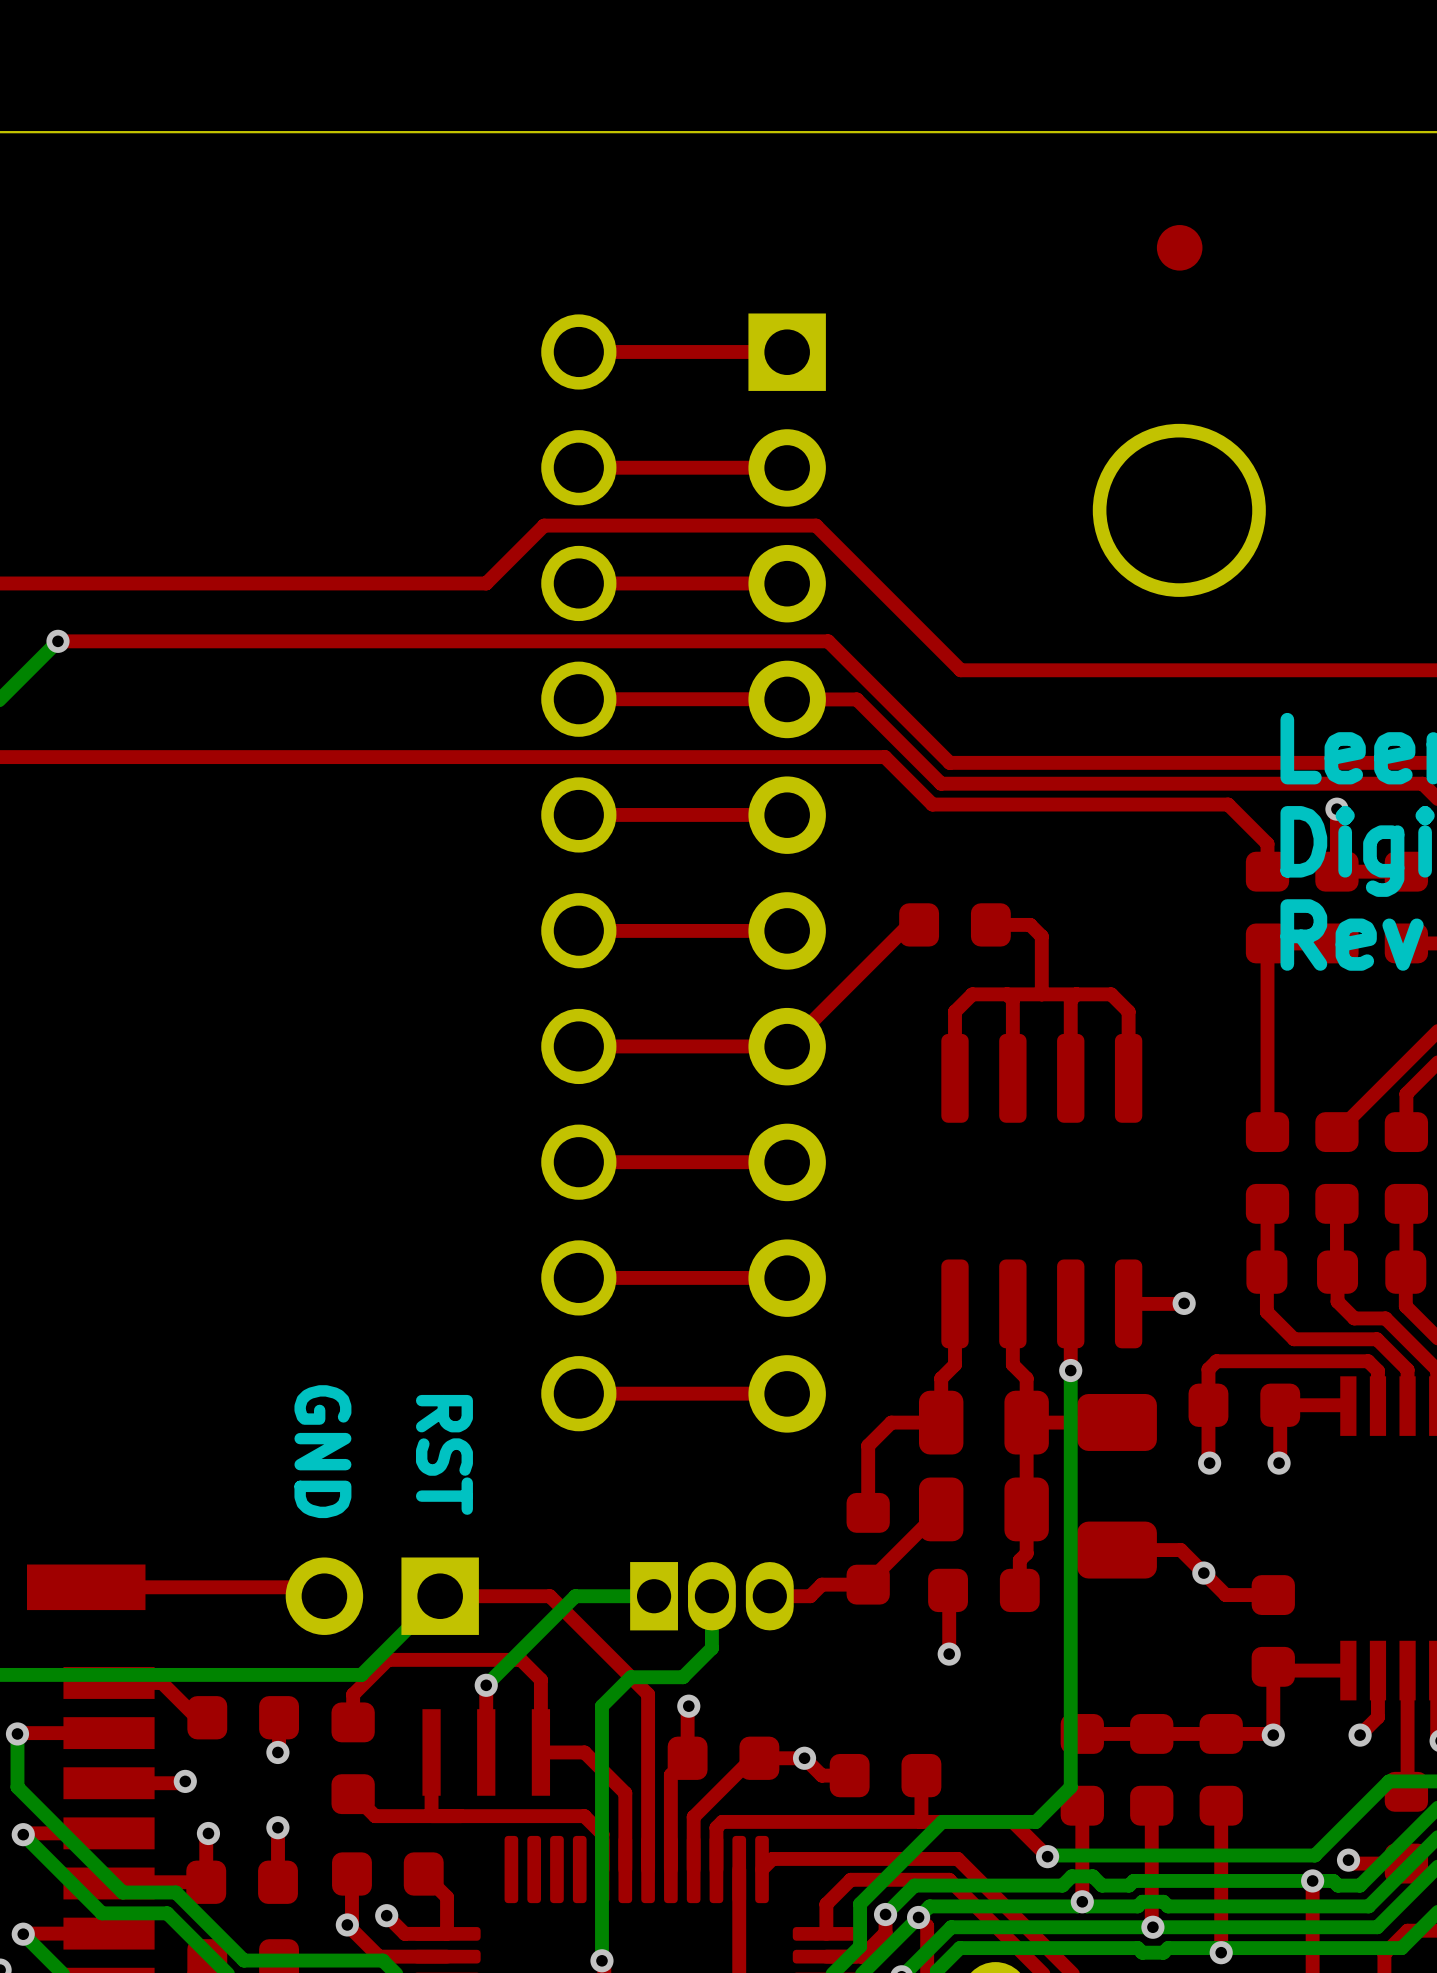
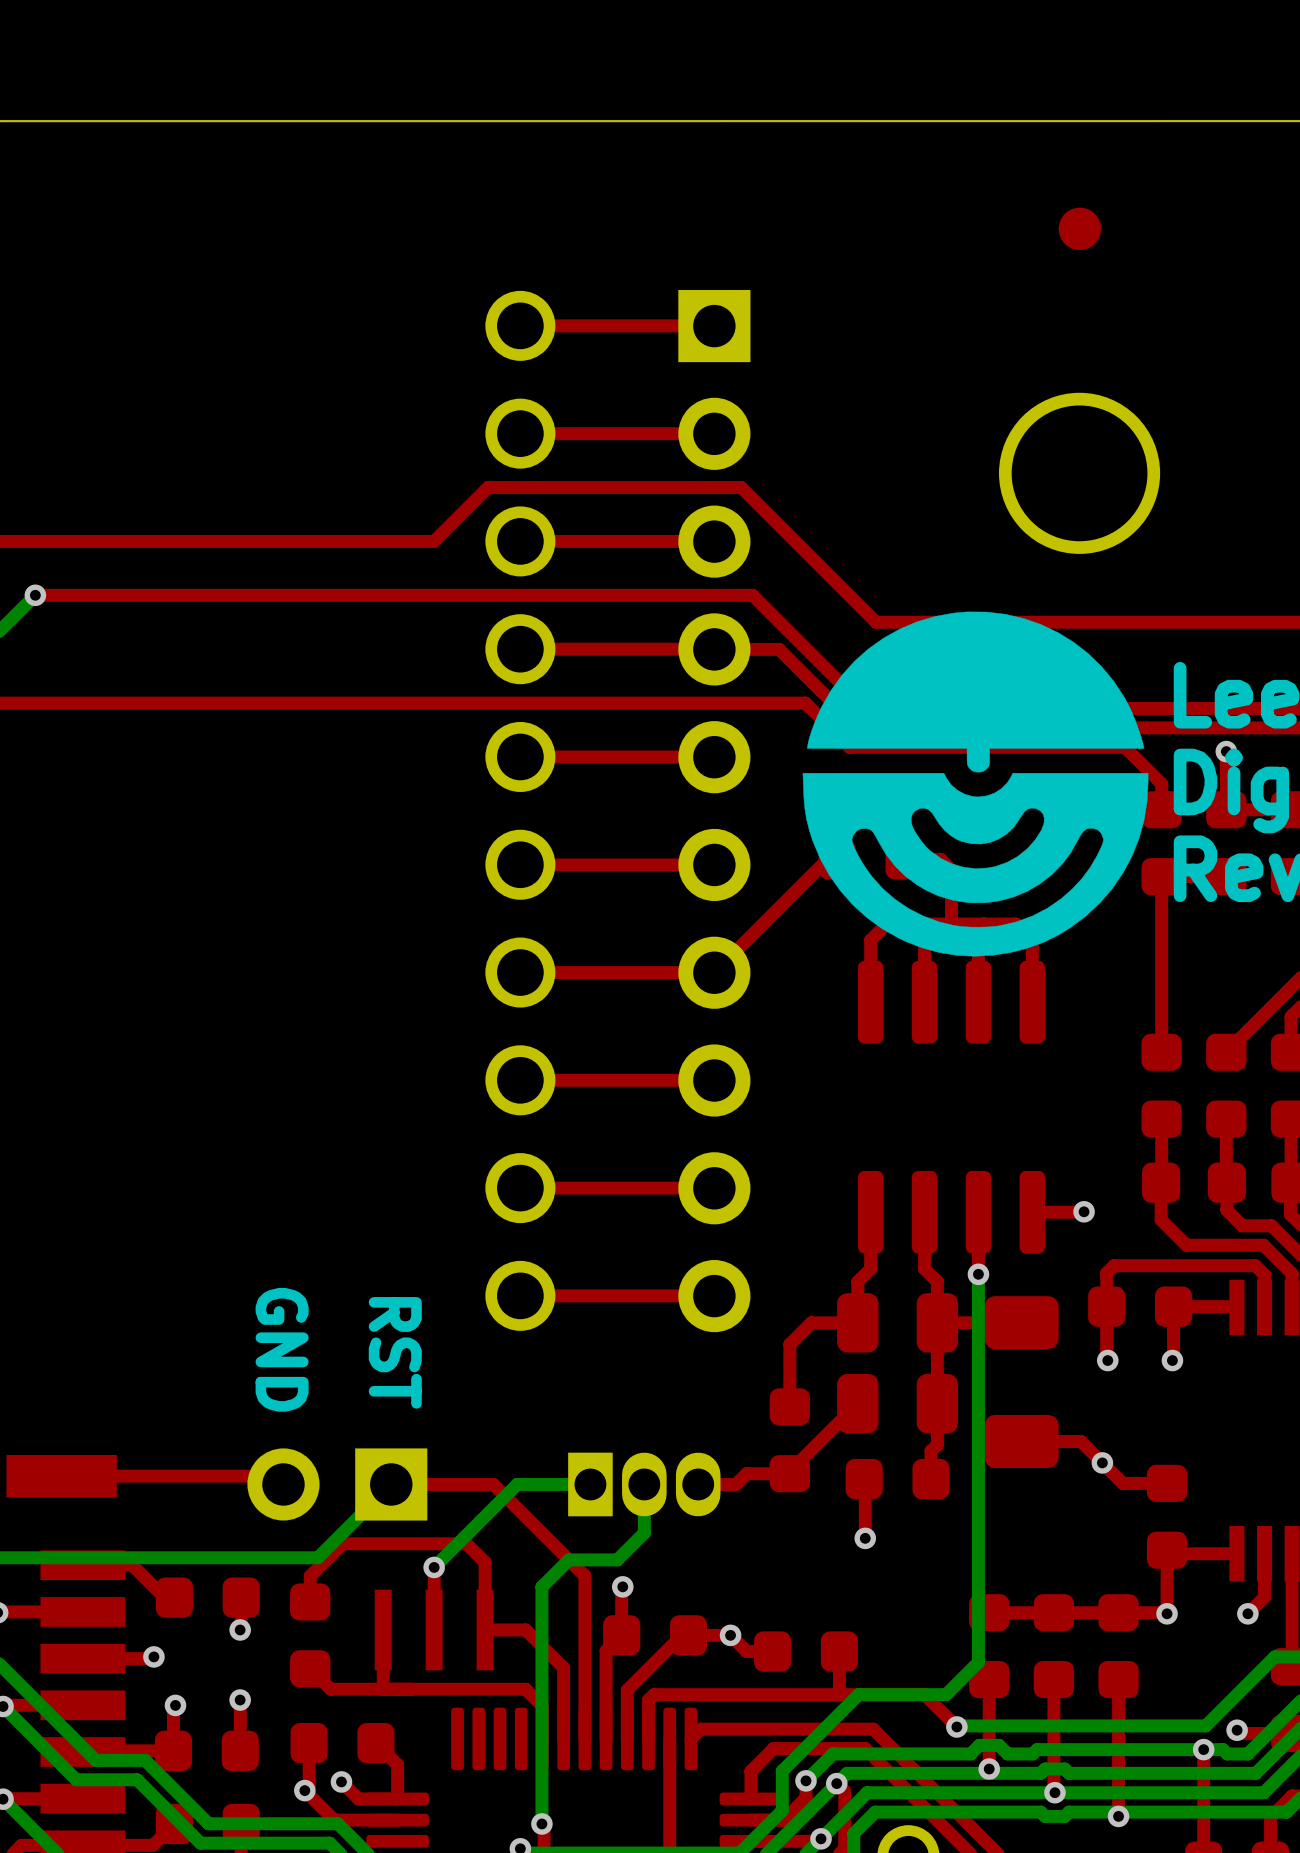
drawing: none -> [802, 611, 1149, 957]

